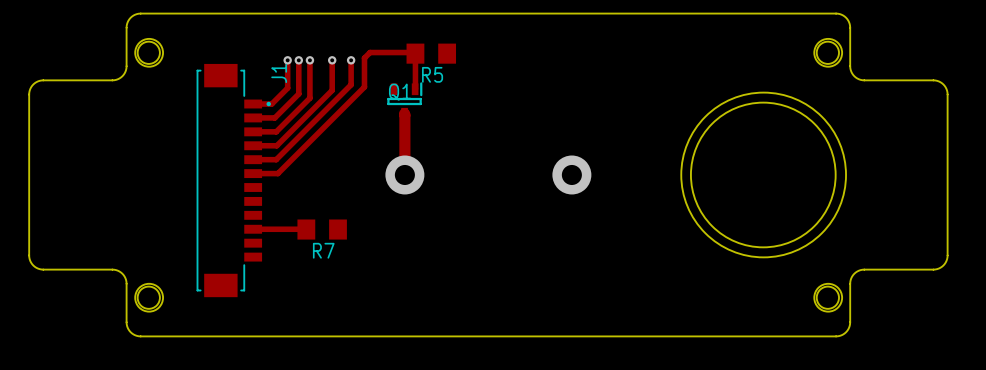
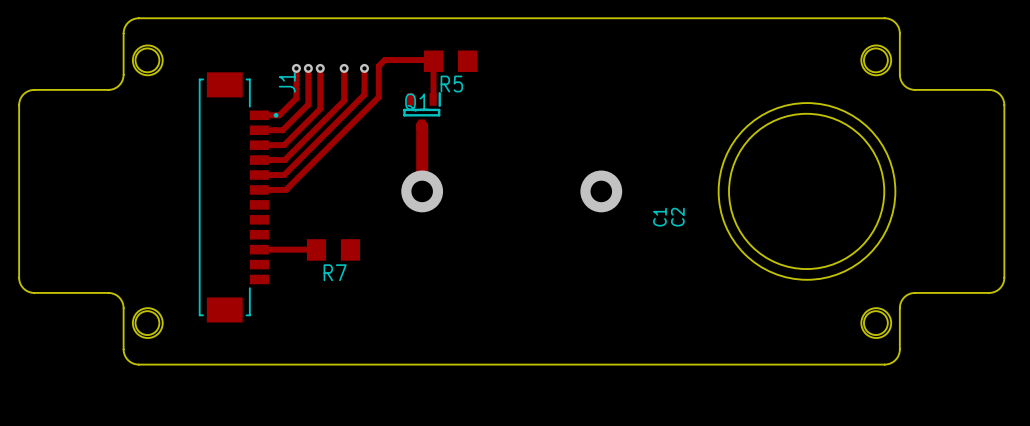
C1: none -> (659, 217)
C2: none -> (677, 217)

